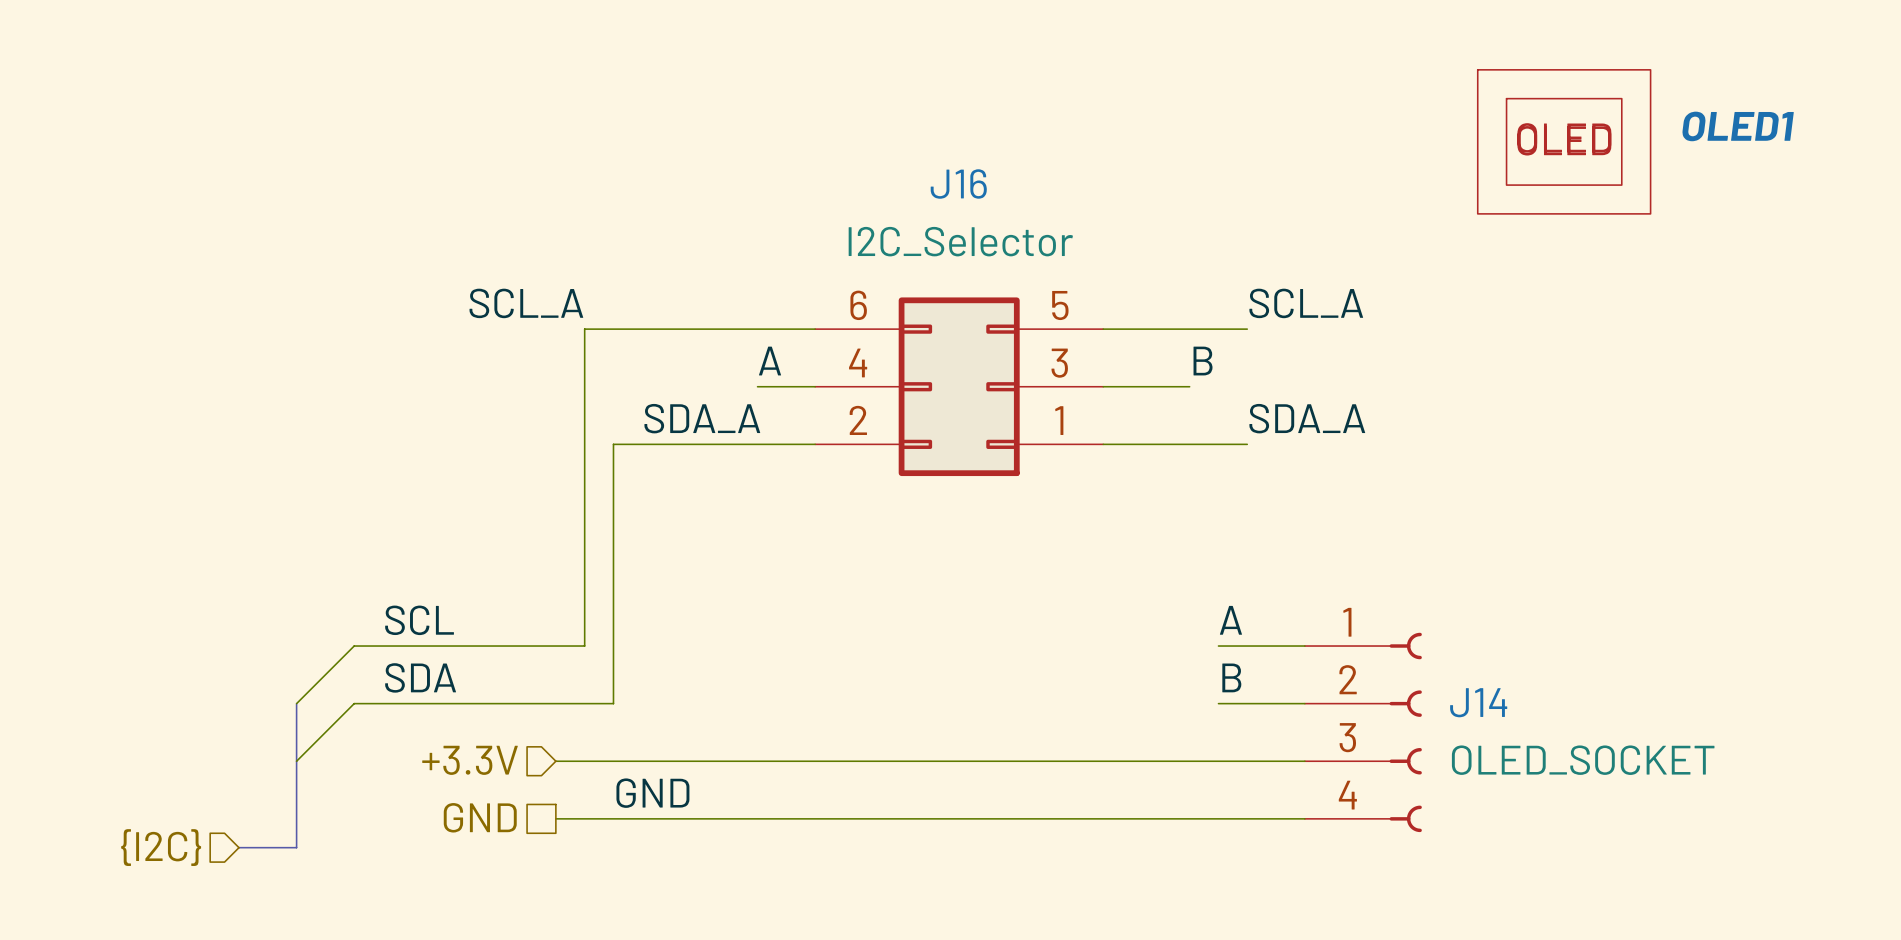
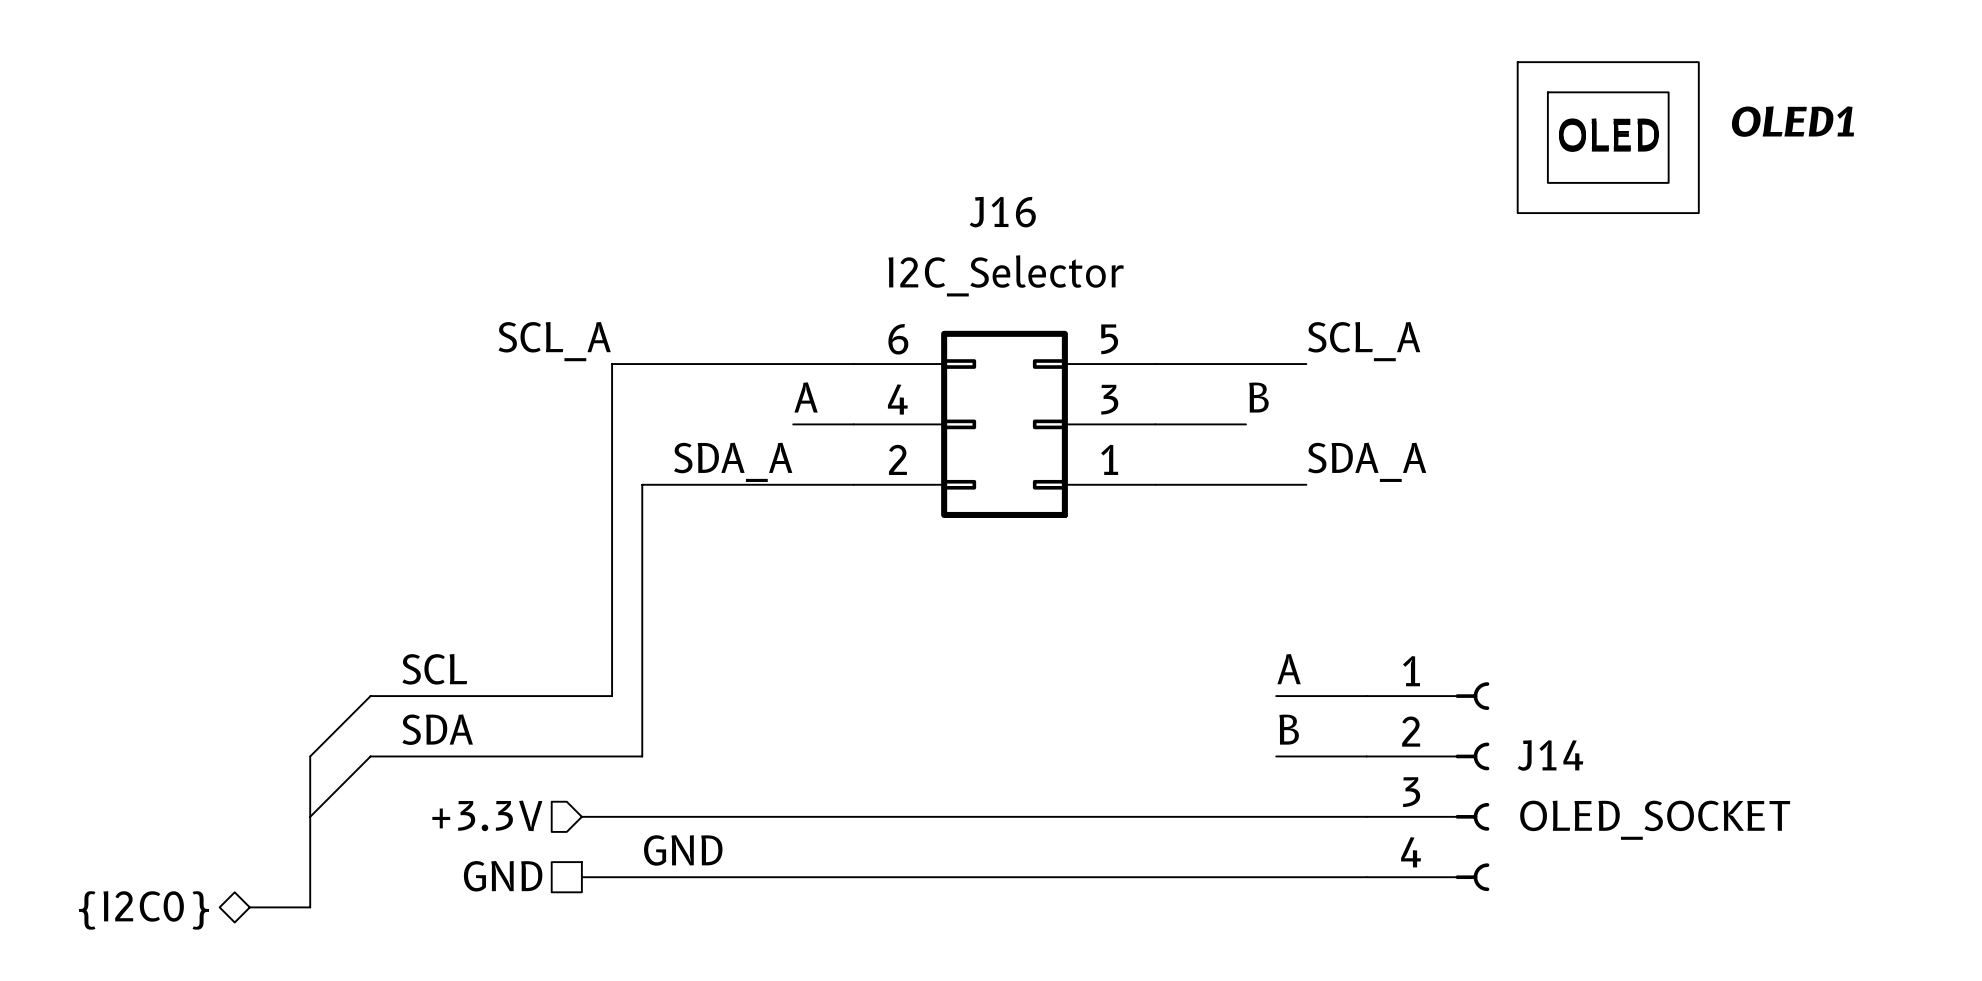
OLED1 position: (1564, 141) -> (1608, 137)
hierarchical label shape: input (161, 847) -> bidirectional (144, 910)
hierarchical label: {I2C} (161, 847) -> {I2C0} (144, 910)

